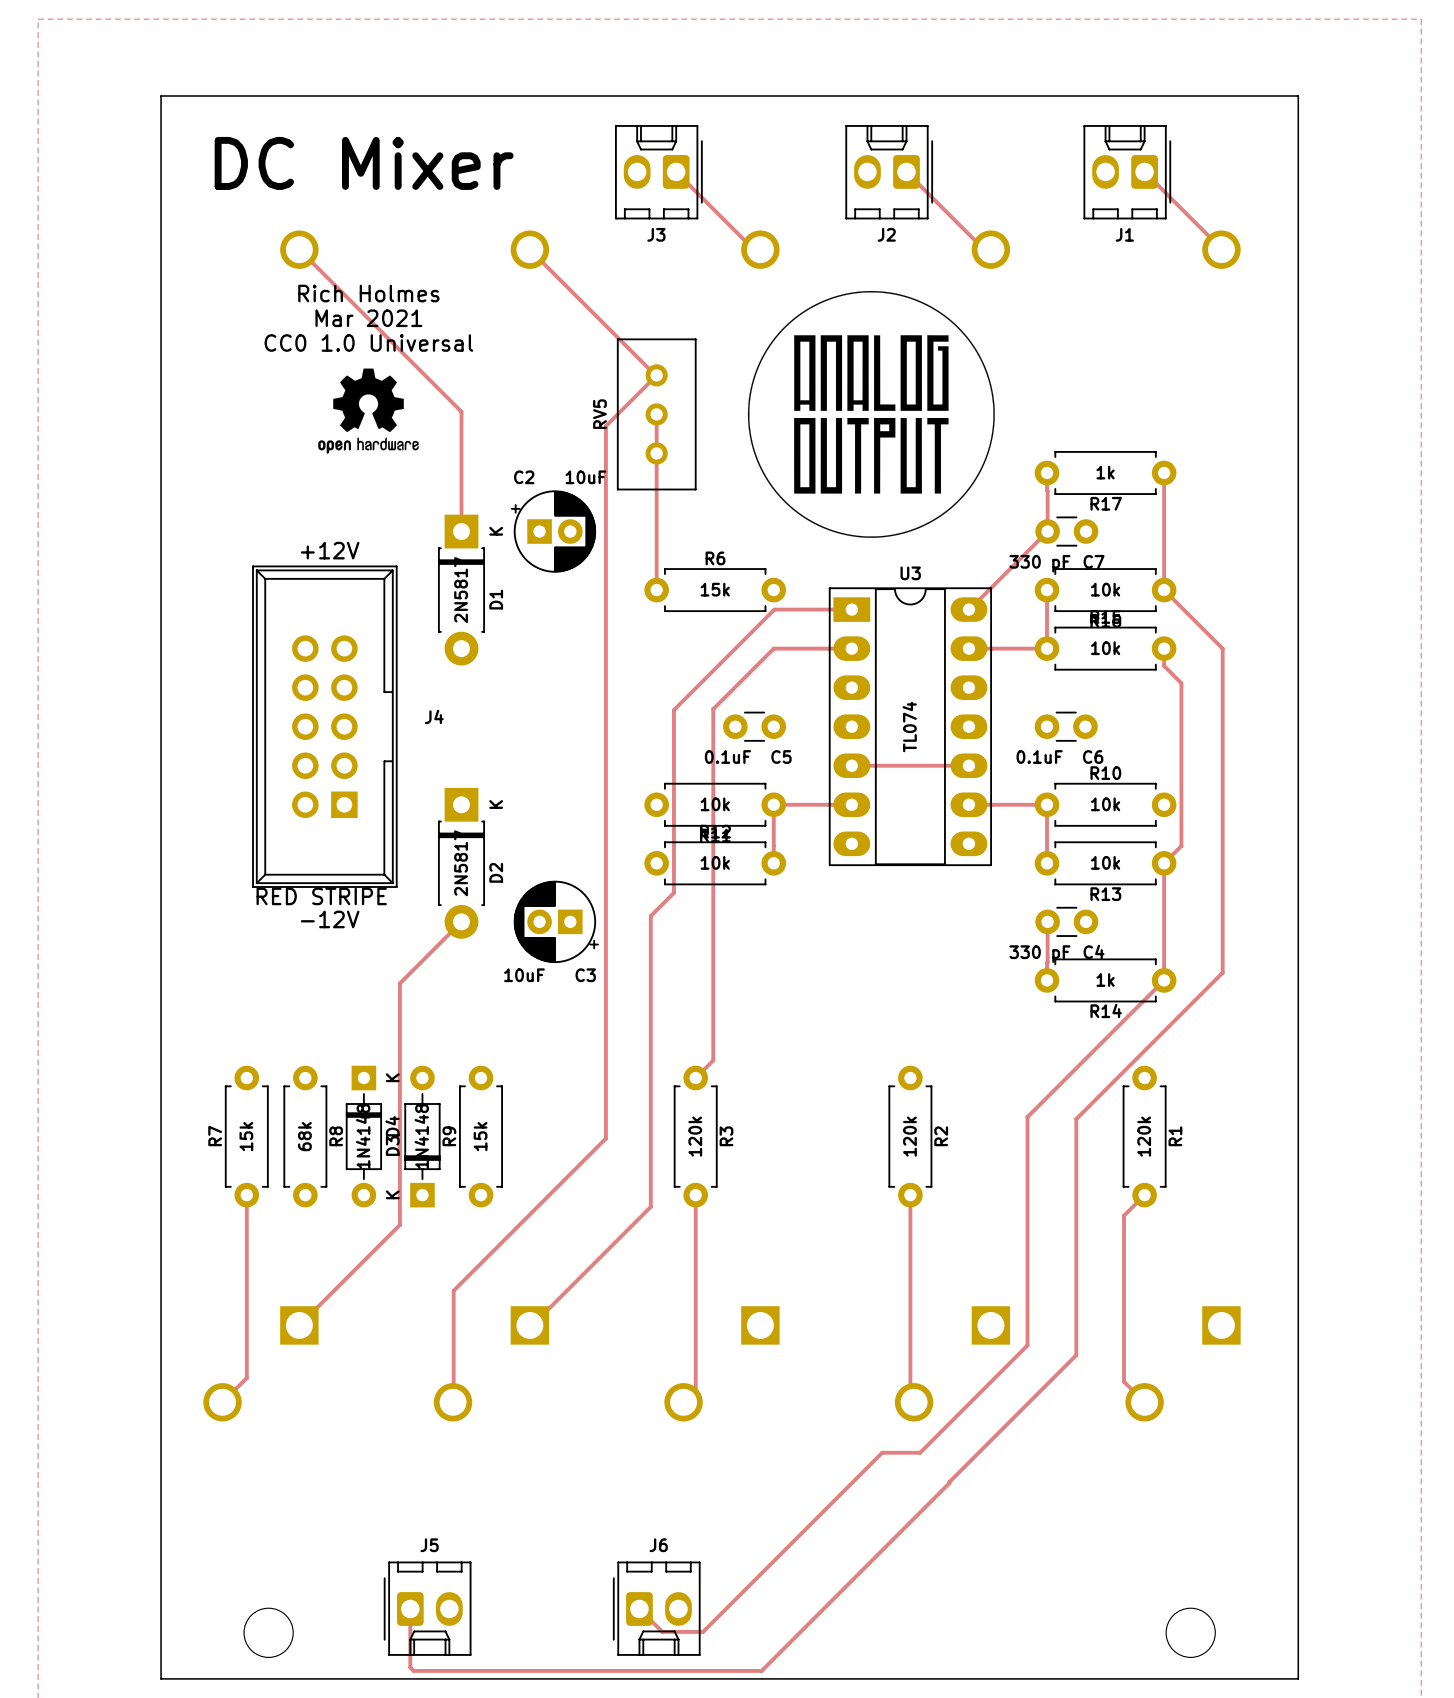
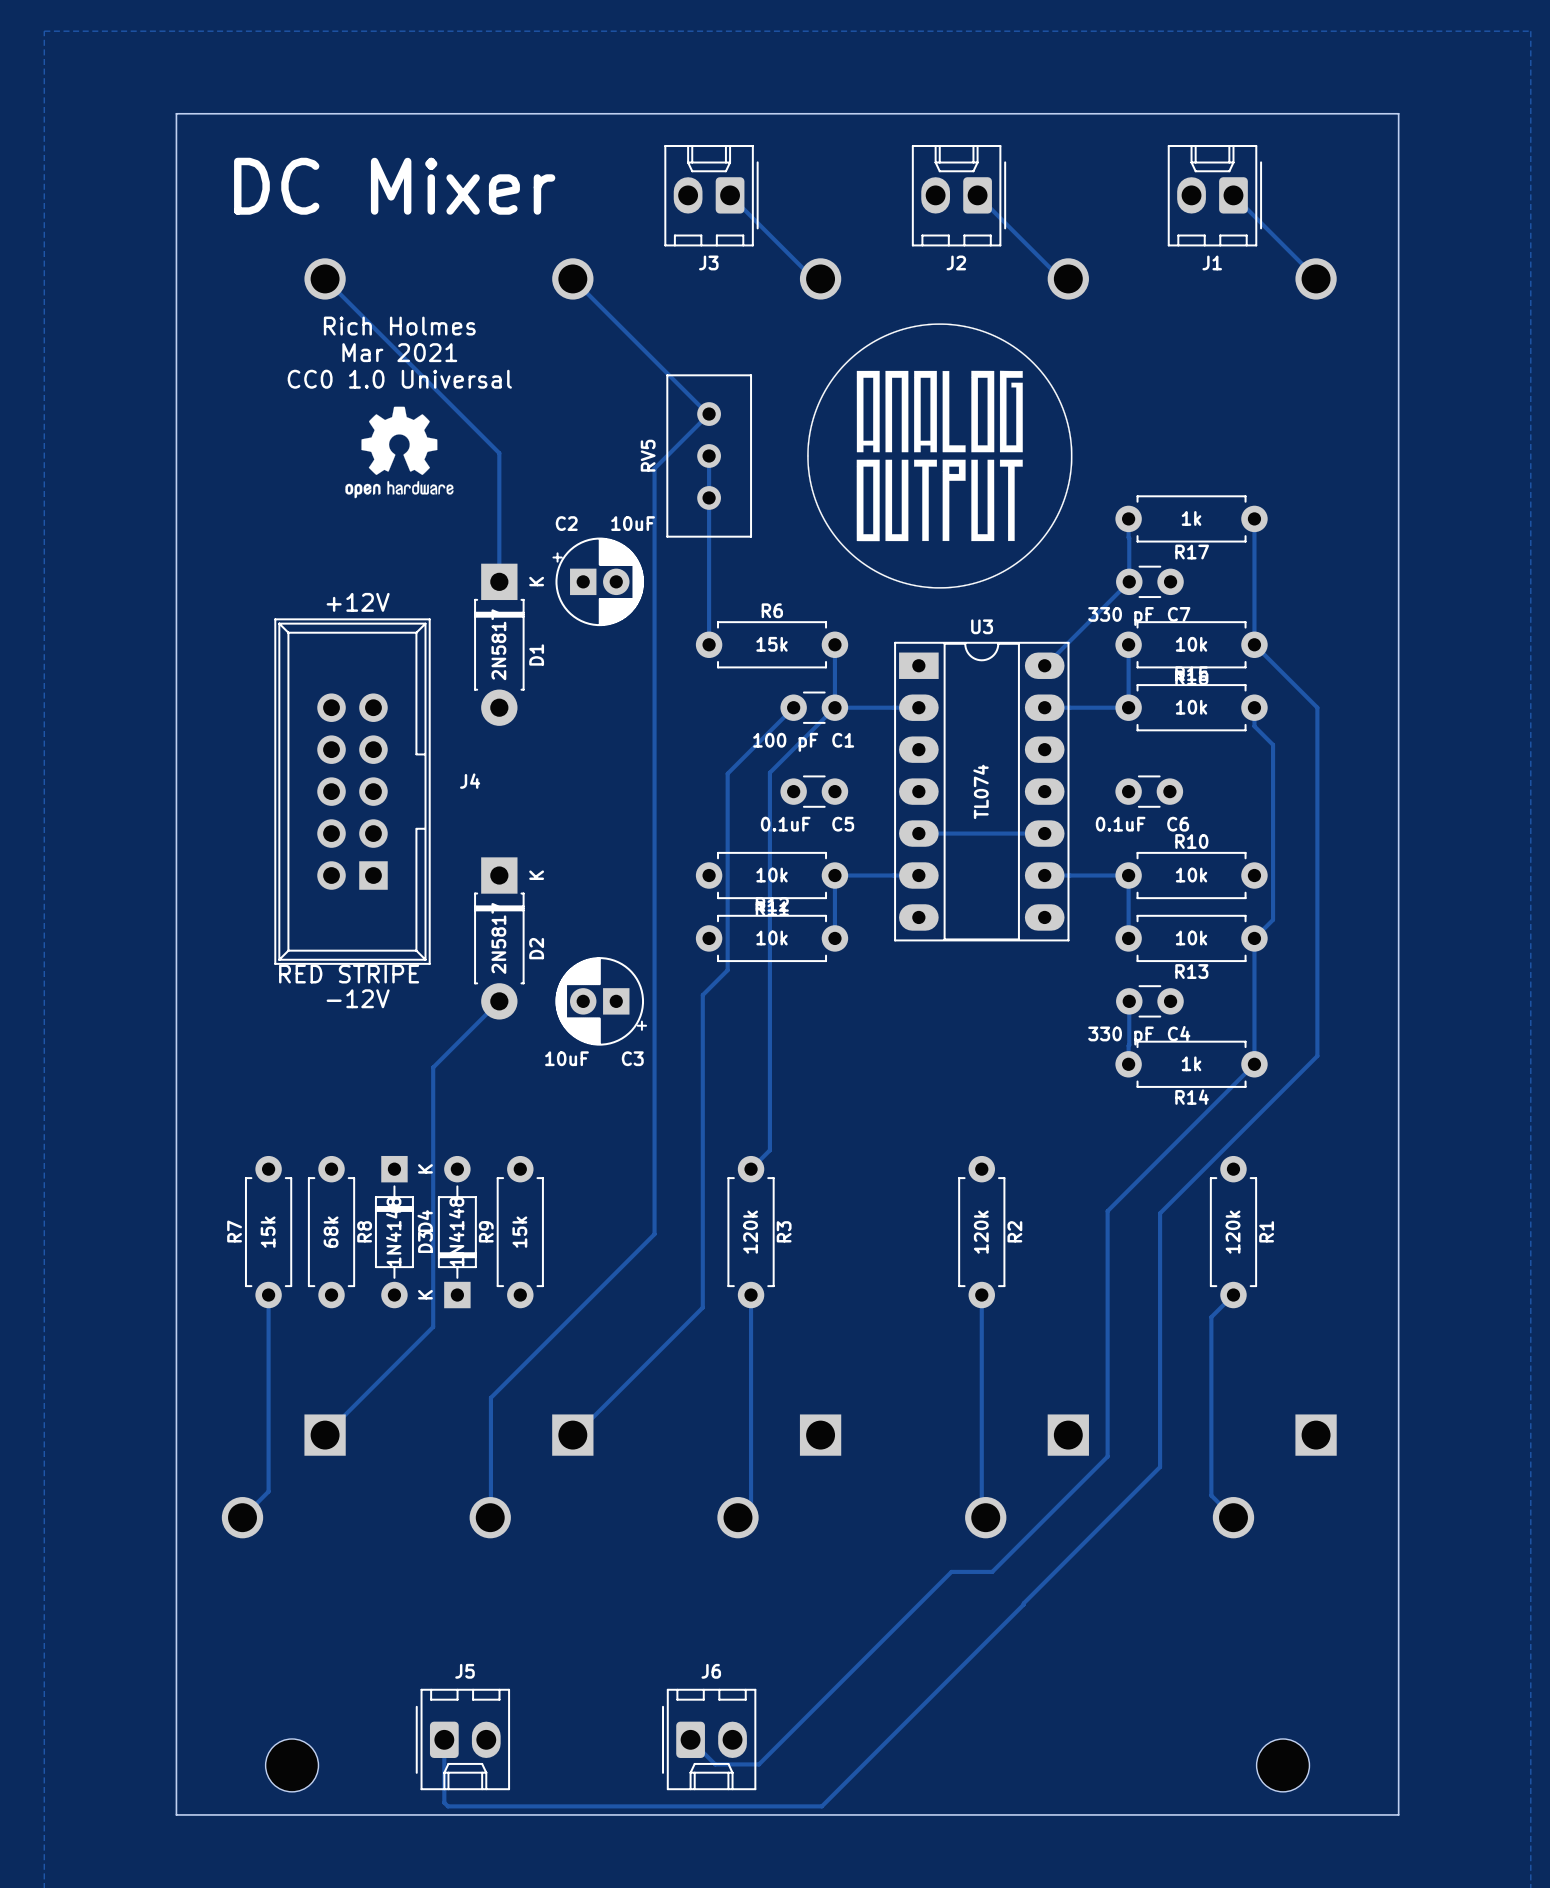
track: none -> (834, 644) (834, 707)
track: (851, 609) (774, 609) (735, 648) -> none
C1: none -> 100 pF (814, 707)

